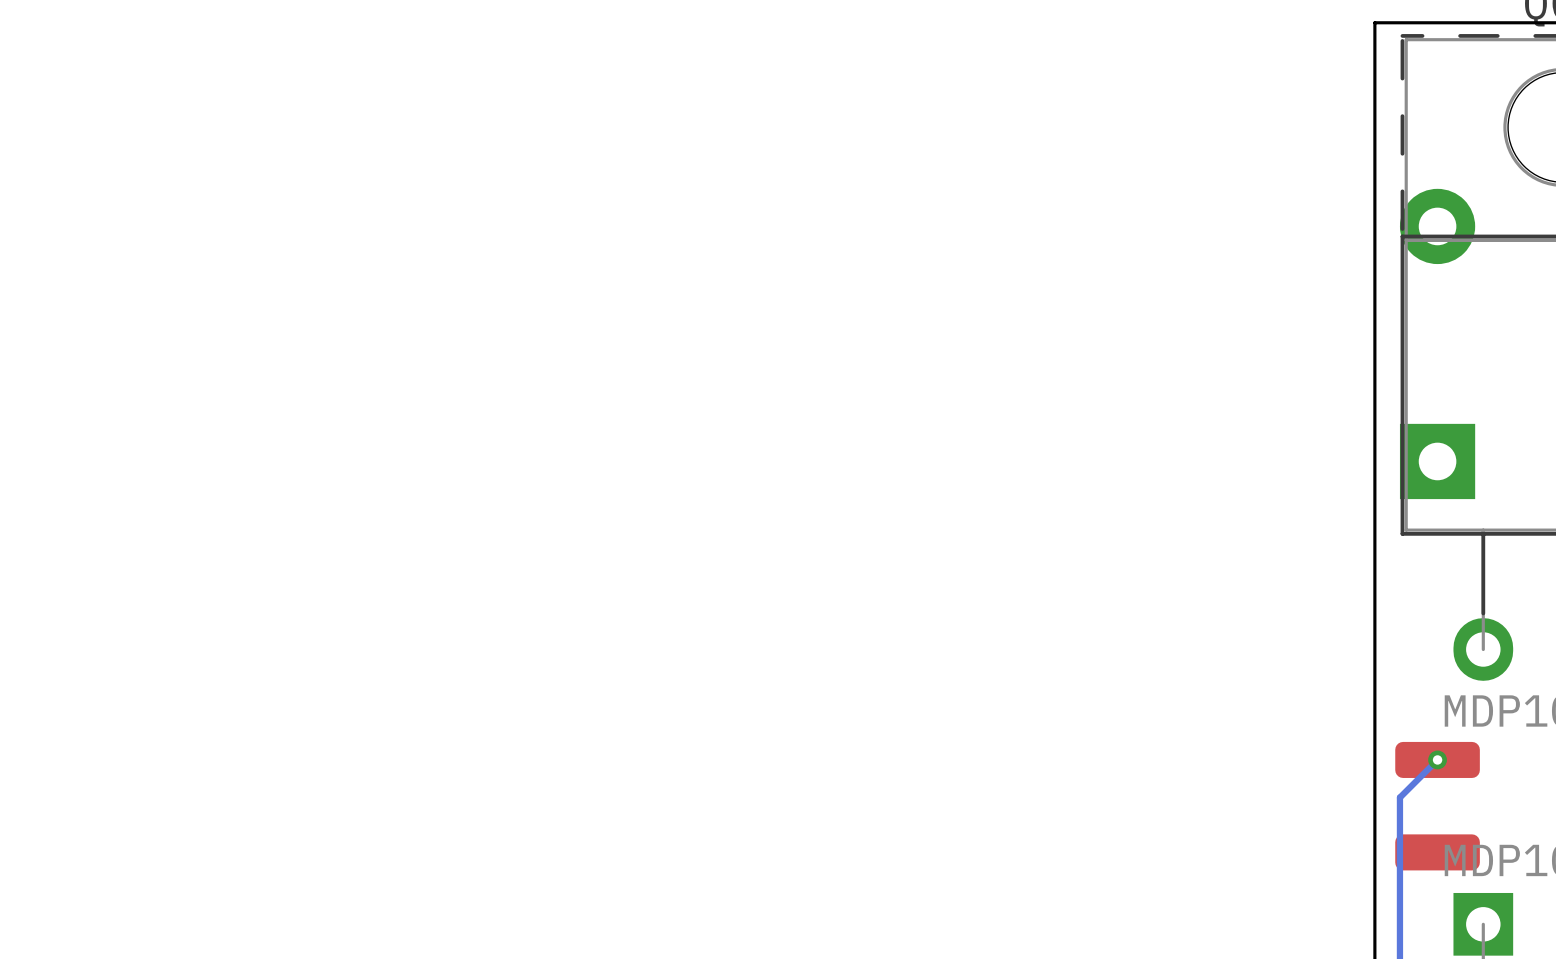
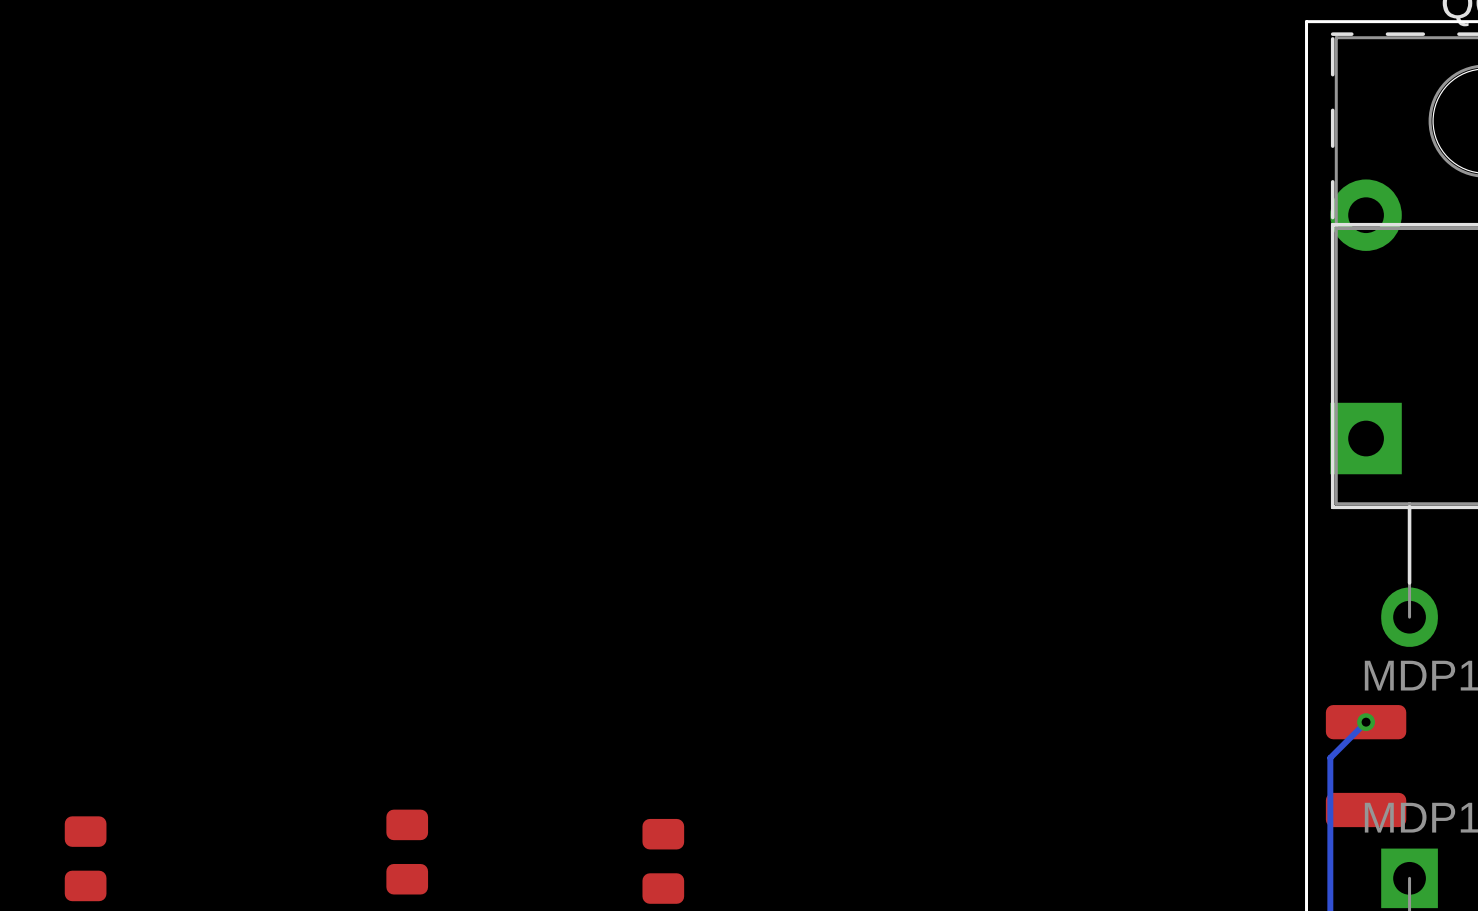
part: none -> (407, 852)
part: none -> (85, 858)
part: none -> (663, 861)

